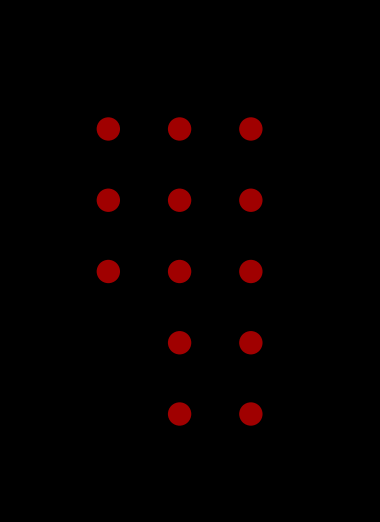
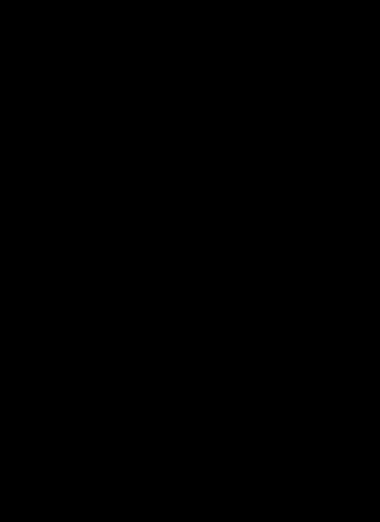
part: (108, 128) -> none
part: (179, 128) -> none
part: (250, 128) -> none
part: (108, 200) -> none
part: (179, 200) -> none
part: (250, 200) -> none
part: (108, 271) -> none
part: (179, 271) -> none
part: (250, 271) -> none
part: (179, 342) -> none
part: (250, 342) -> none
part: (179, 414) -> none
part: (250, 414) -> none

